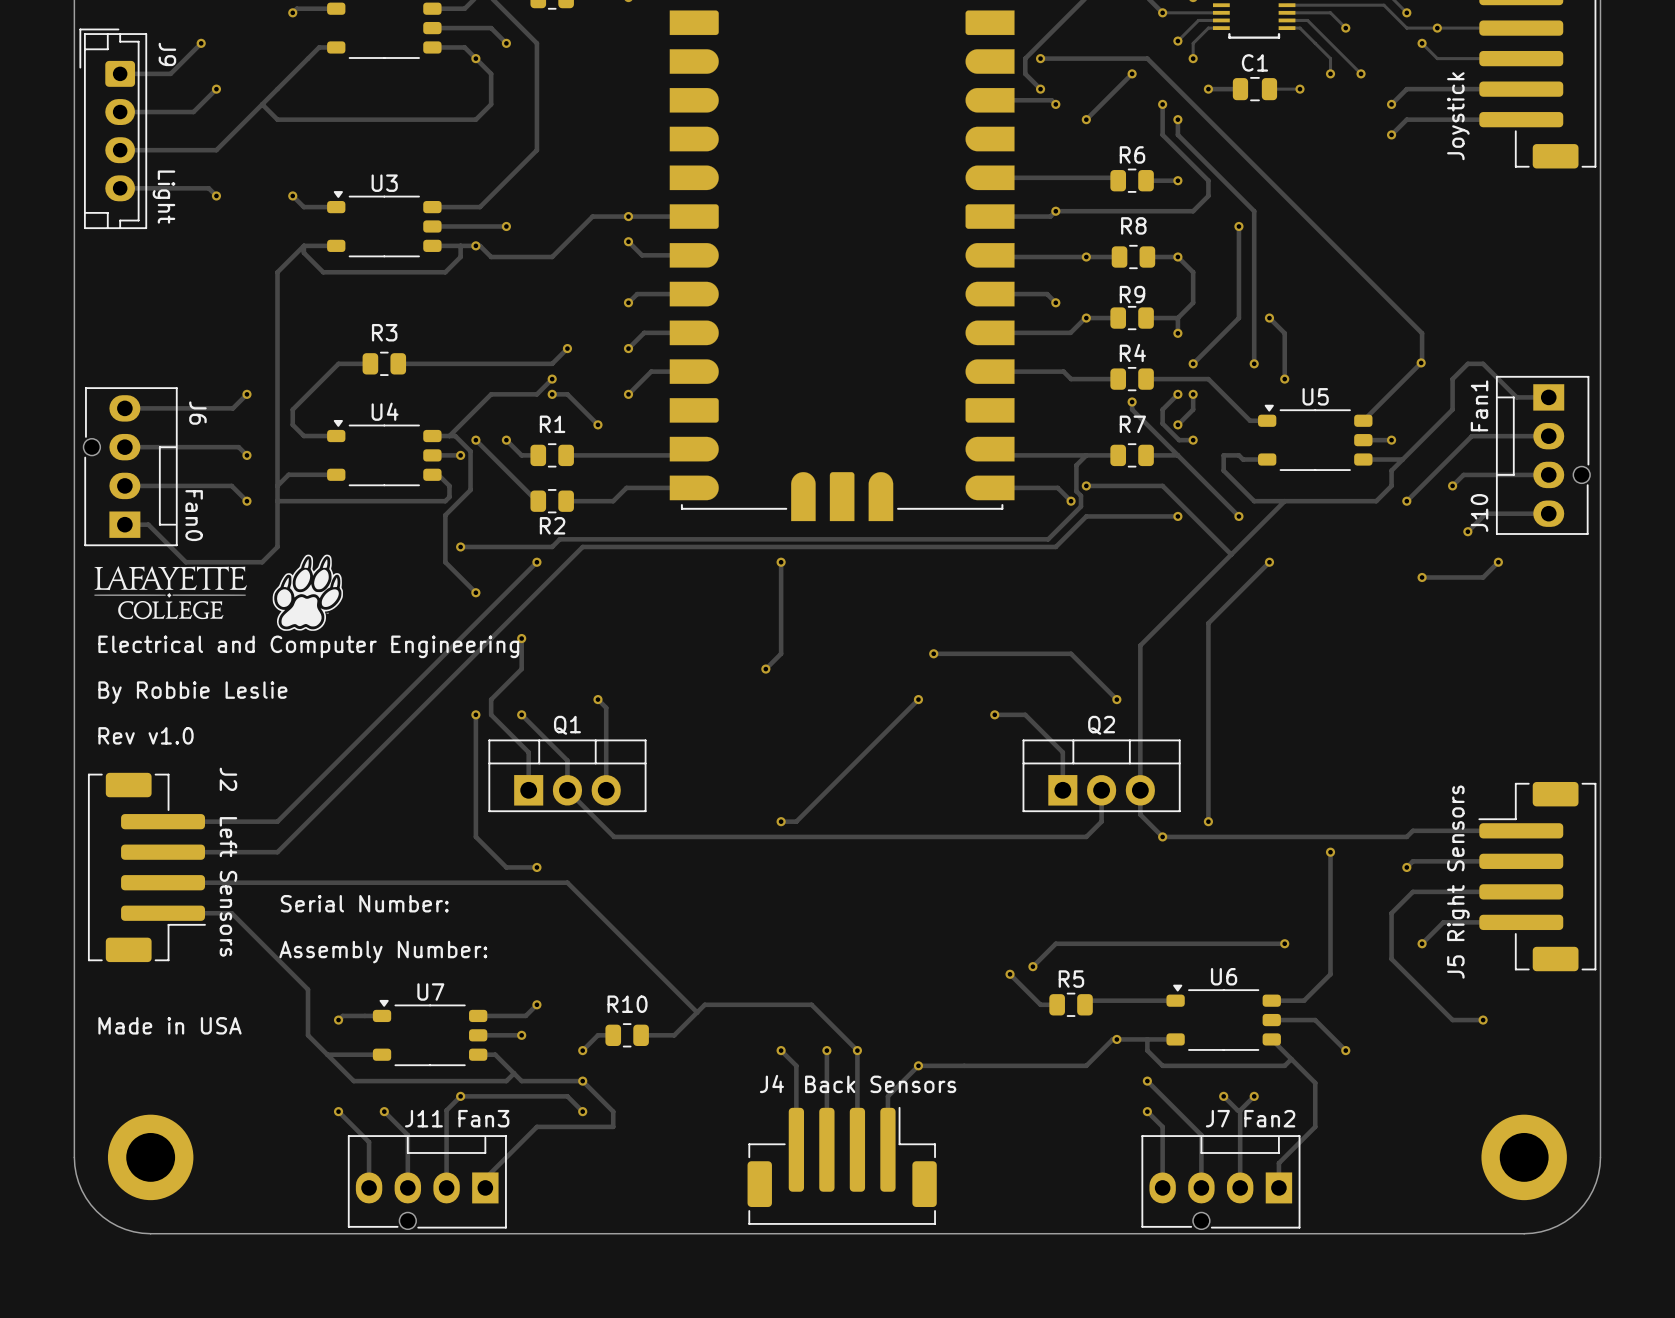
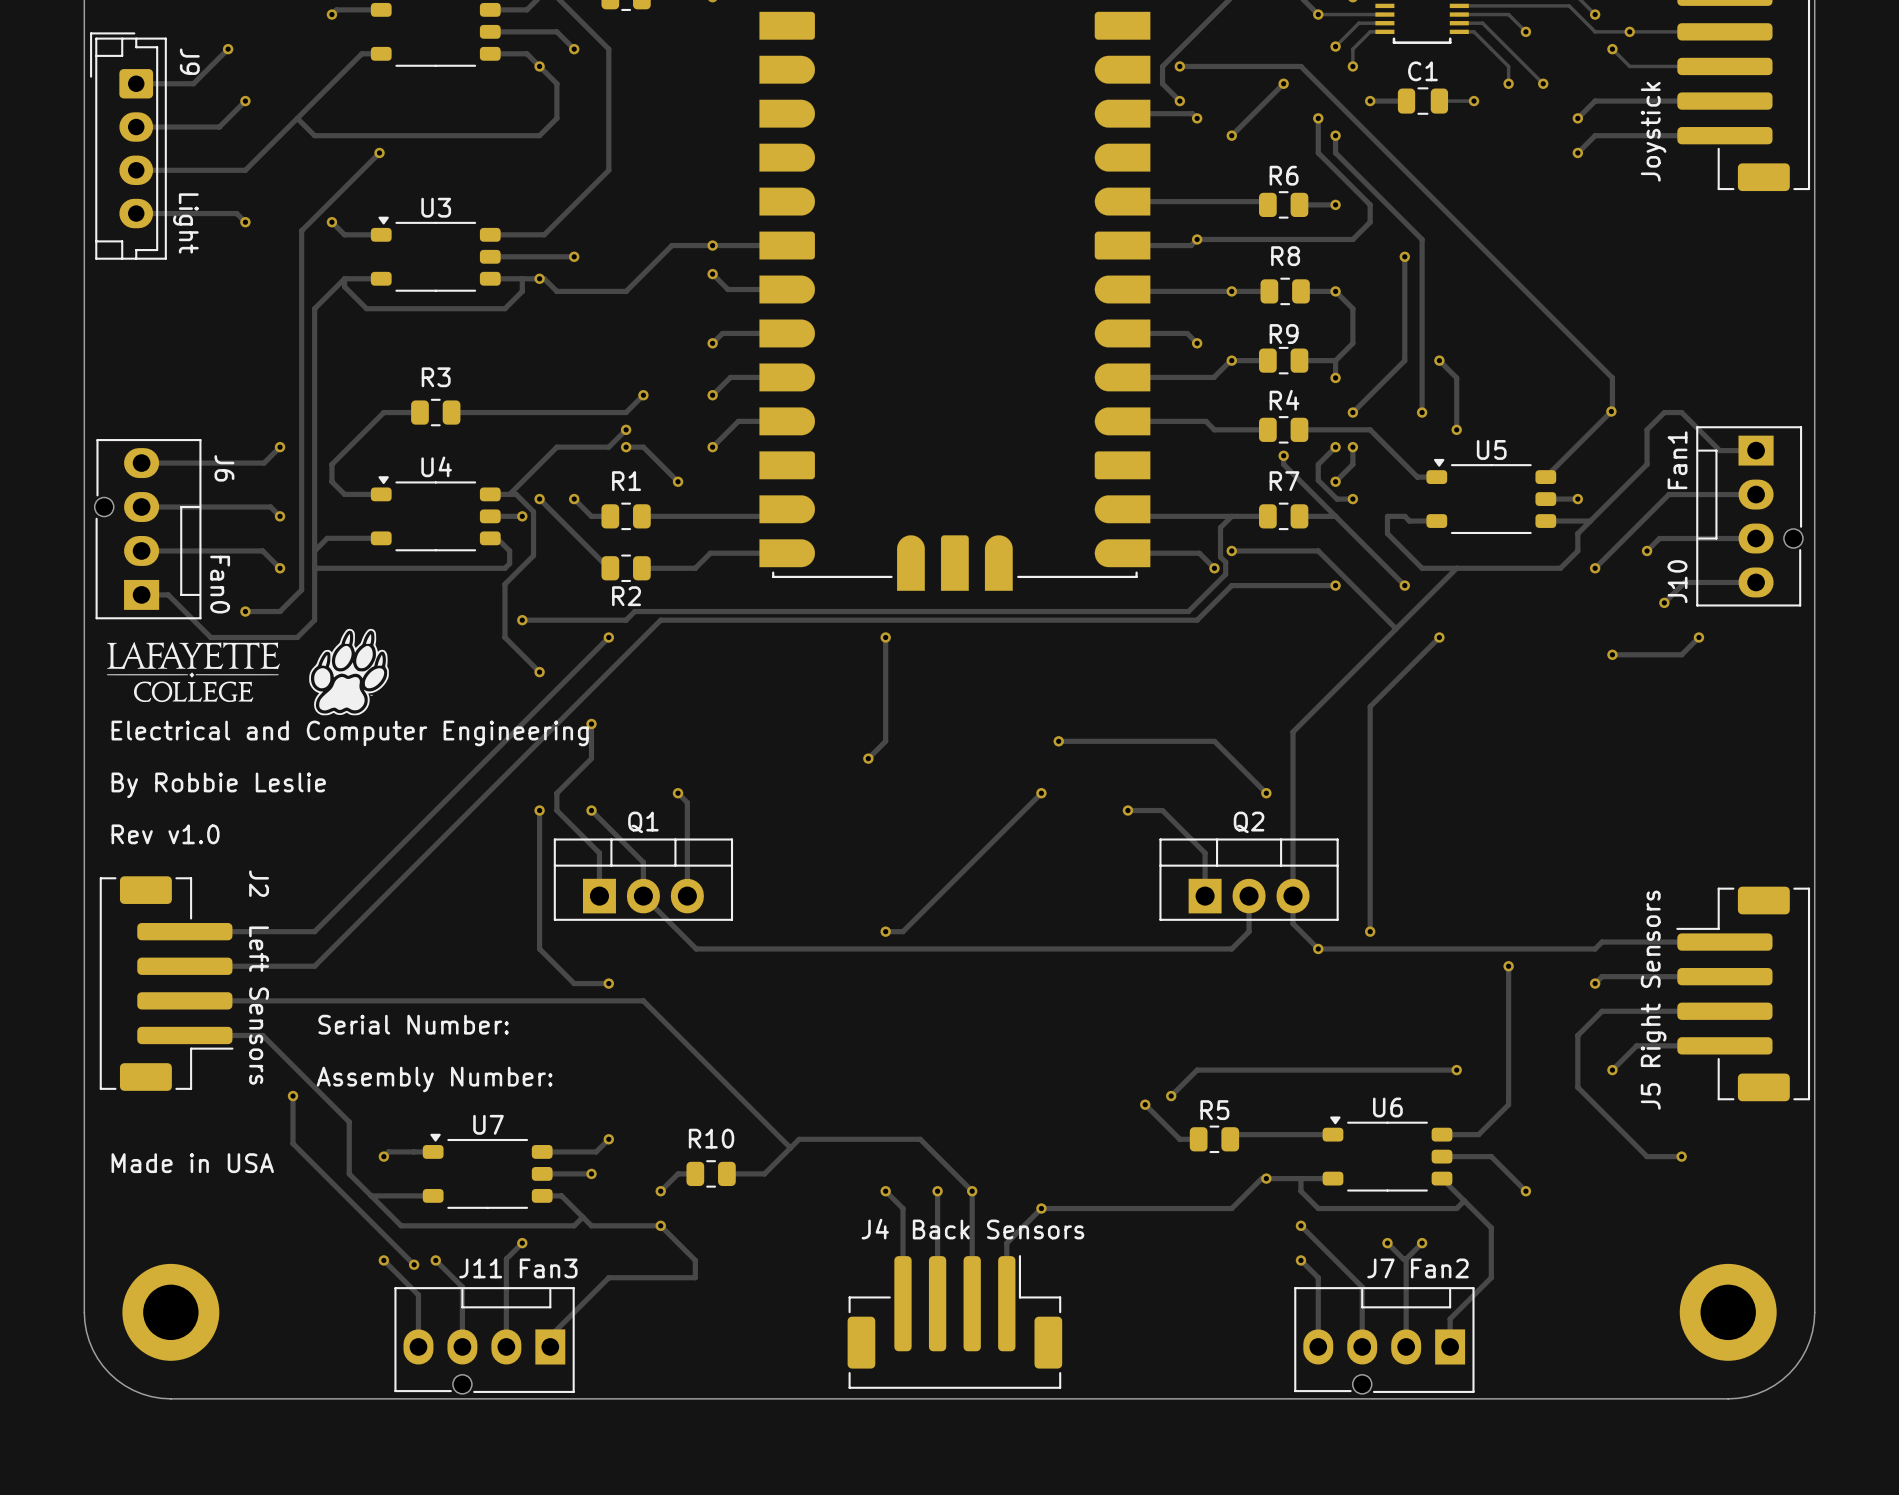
track: none -> (379, 152) (301, 230) (301, 589) (280, 611) (245, 611)
via: none -> (379, 152)
via: none -> (245, 611)
track: none -> (293, 1096) (293, 1143) (414, 1264)
via: none -> (293, 1096)
track: (460, 1096) (567, 1096) (582, 1111) -> none
via: (582, 1111) -> none
via: none -> (414, 1264)

